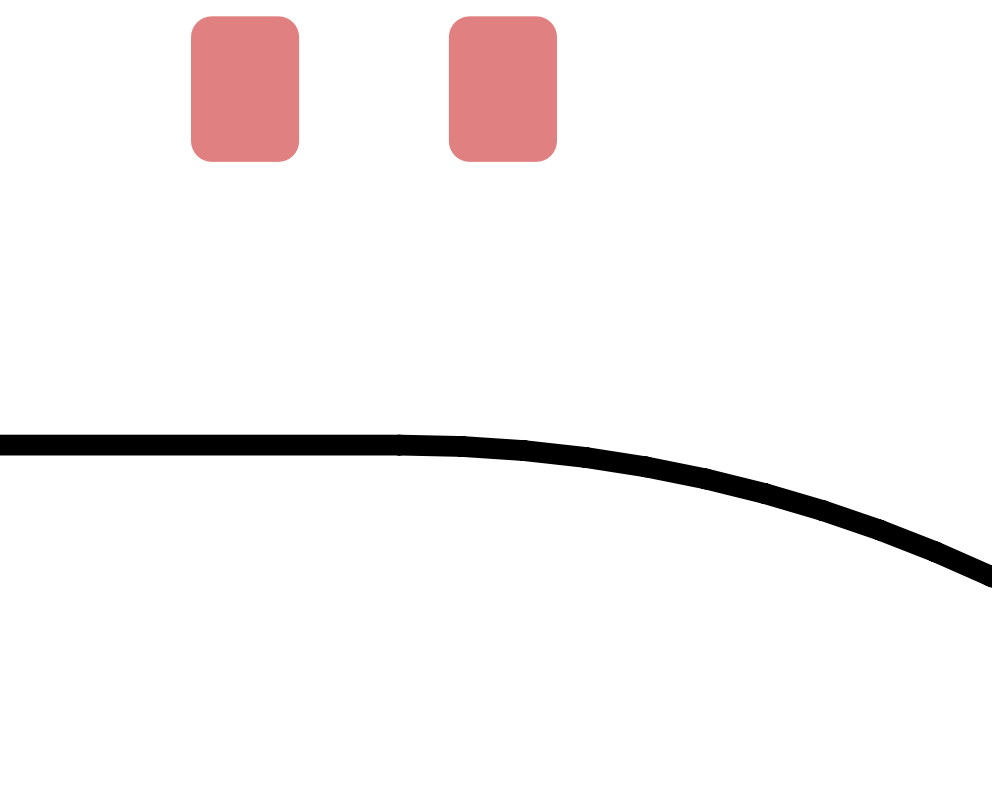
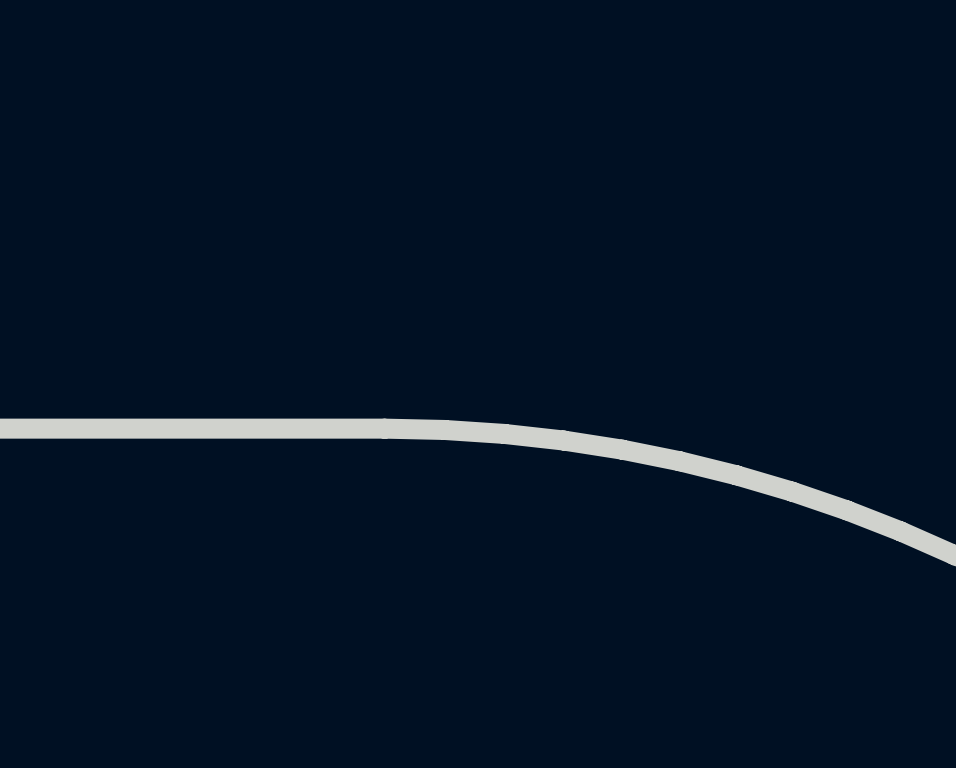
part: (374, 89) -> none

